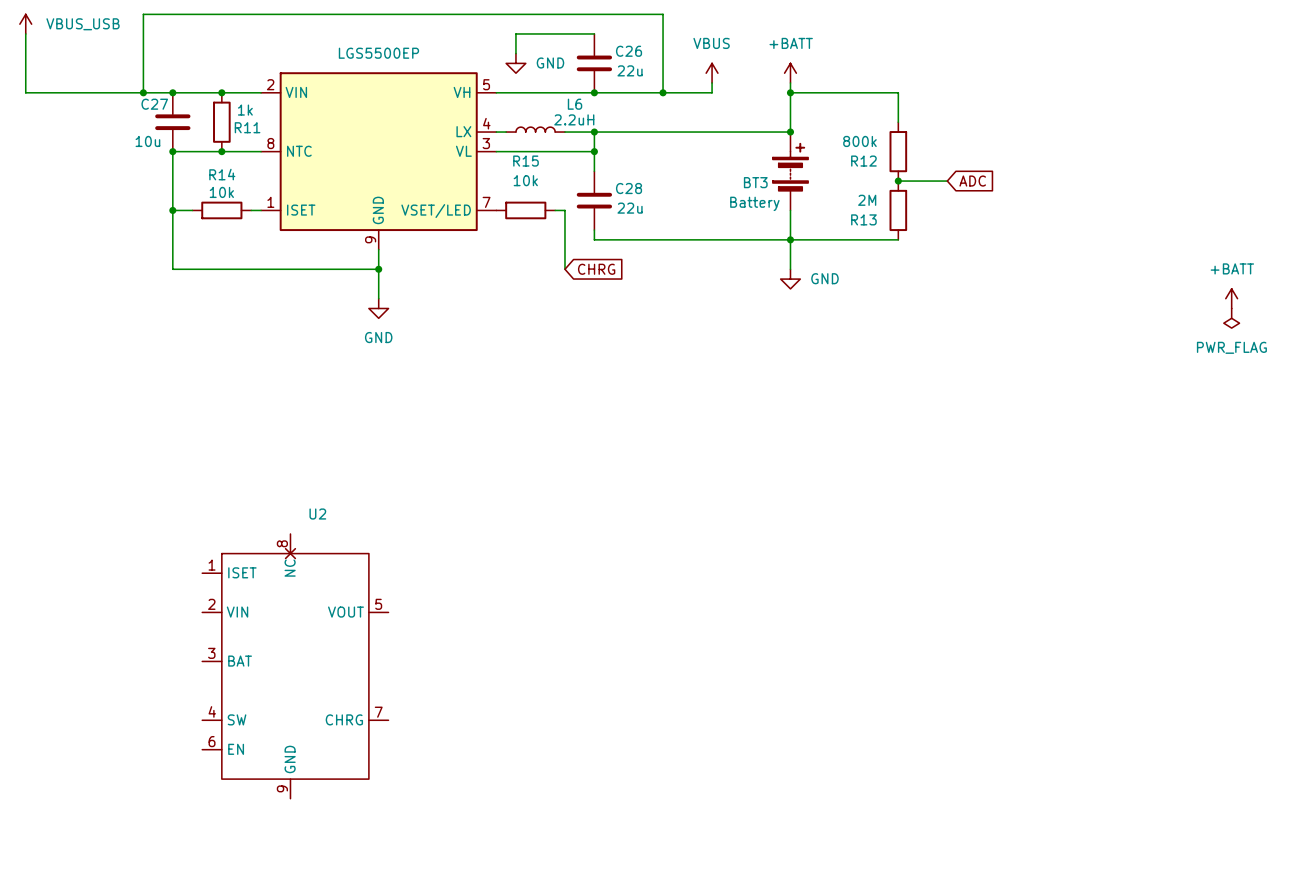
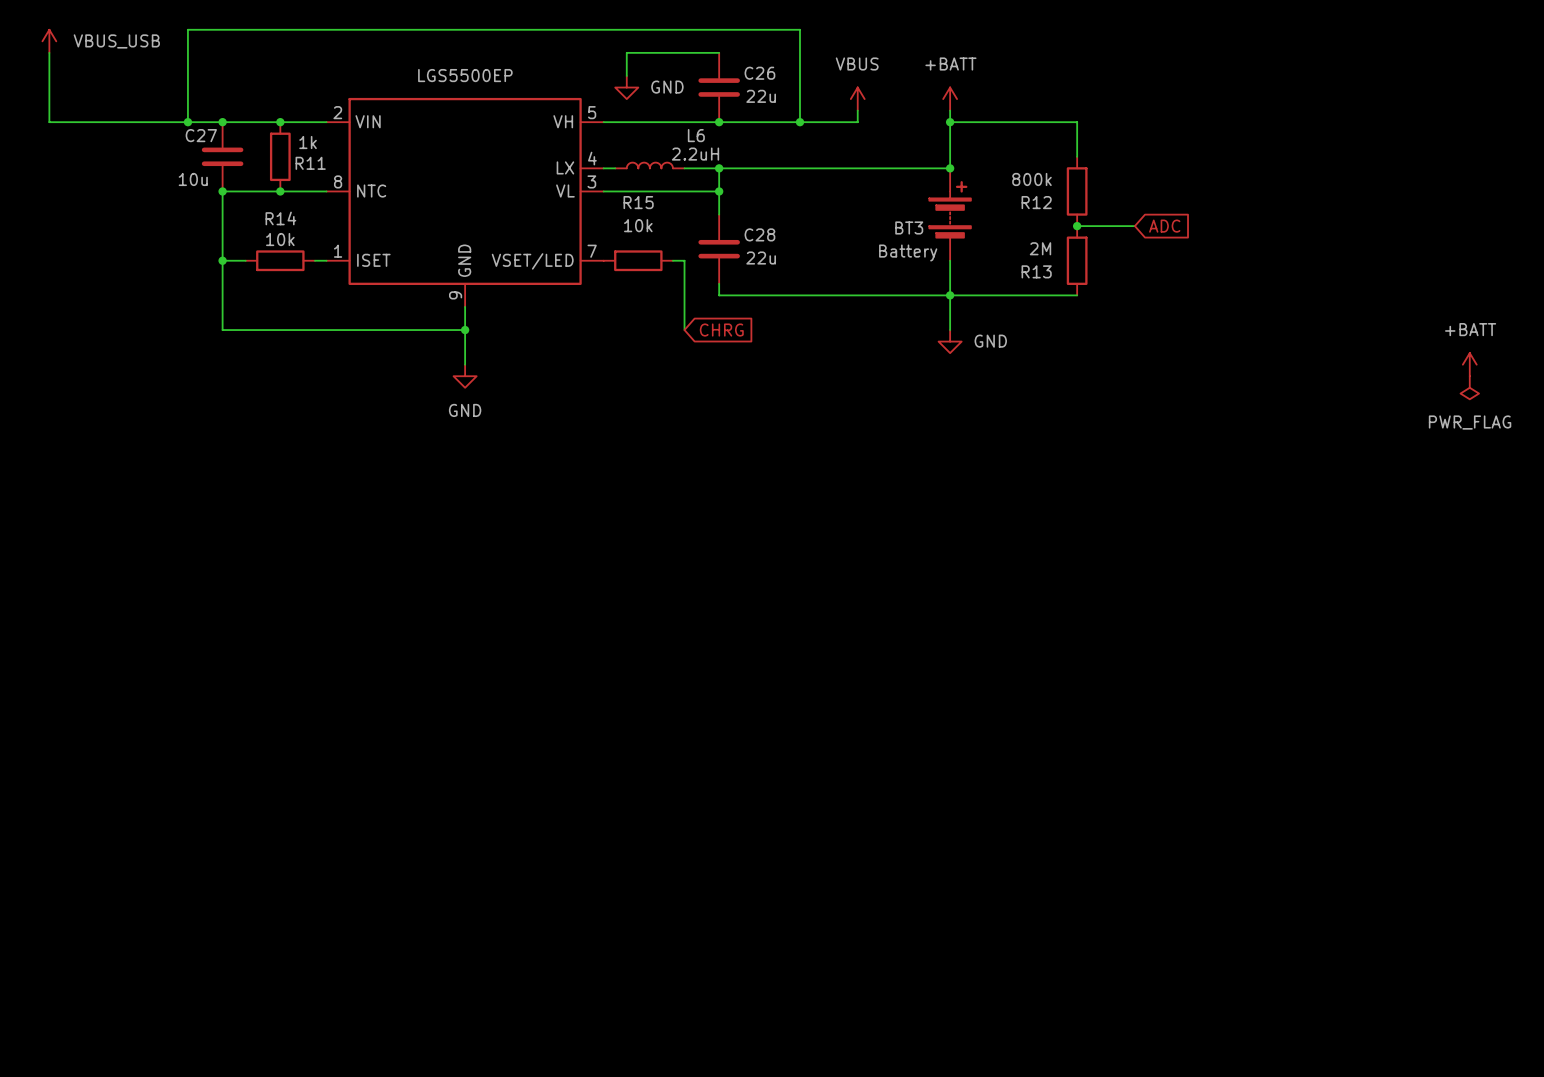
U2: (295, 666) -> none

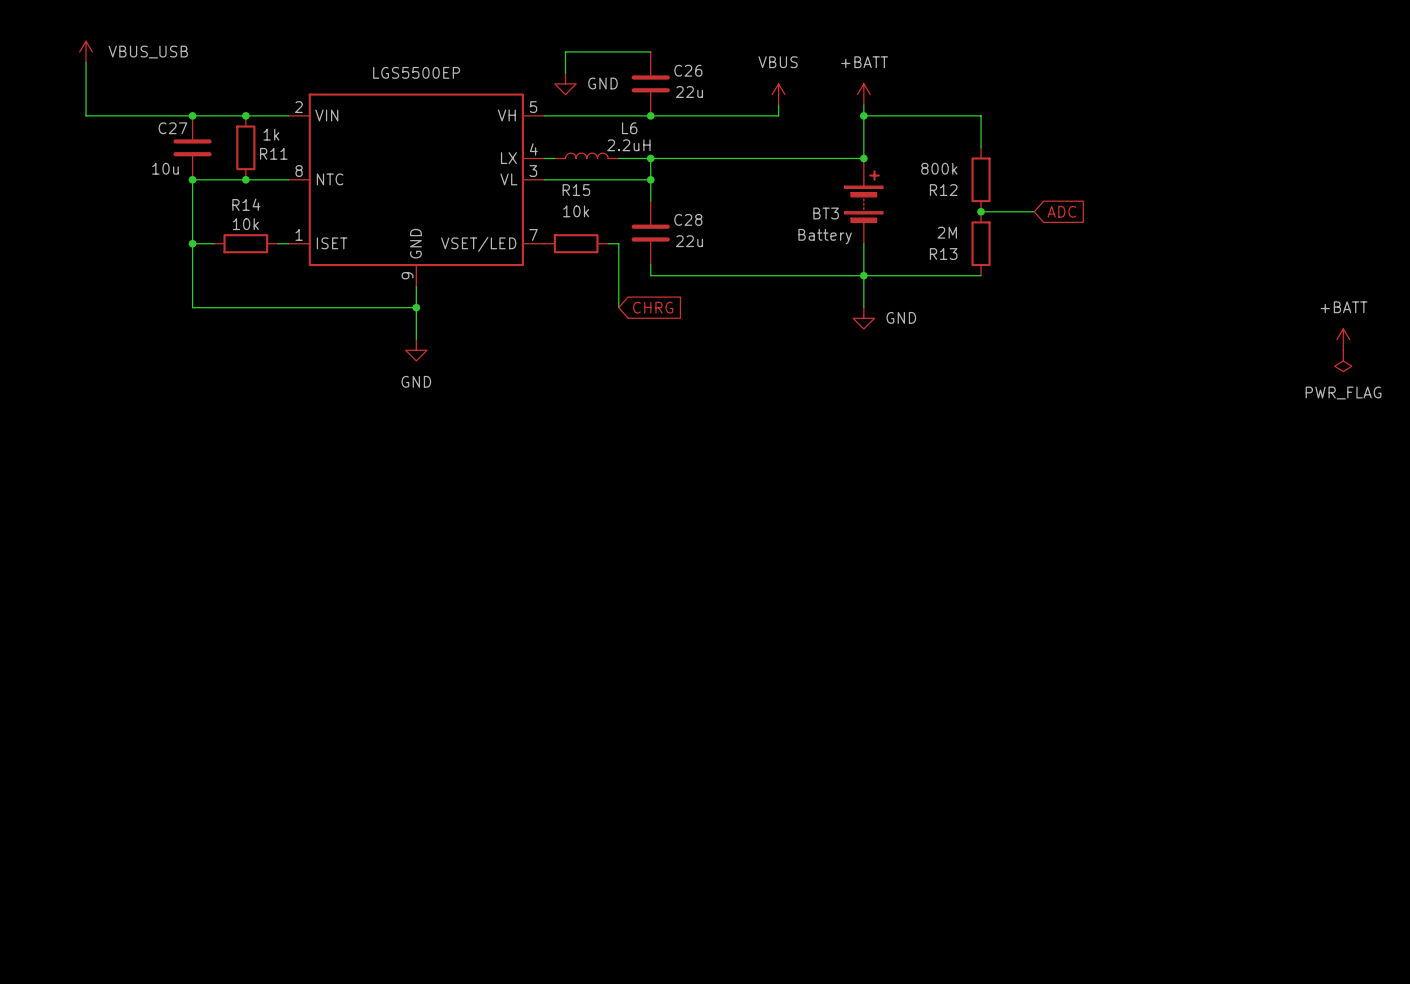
power symbol position: VBUS_USB (49, 41) -> VBUS_USB (86, 51)
wire: (49, 52) (49, 122) (107, 122) -> (86, 62) (86, 115)
wire: (187, 122) (187, 29) (800, 29) (800, 122) -> none
junction: (187, 122) -> none
junction: (800, 122) -> none

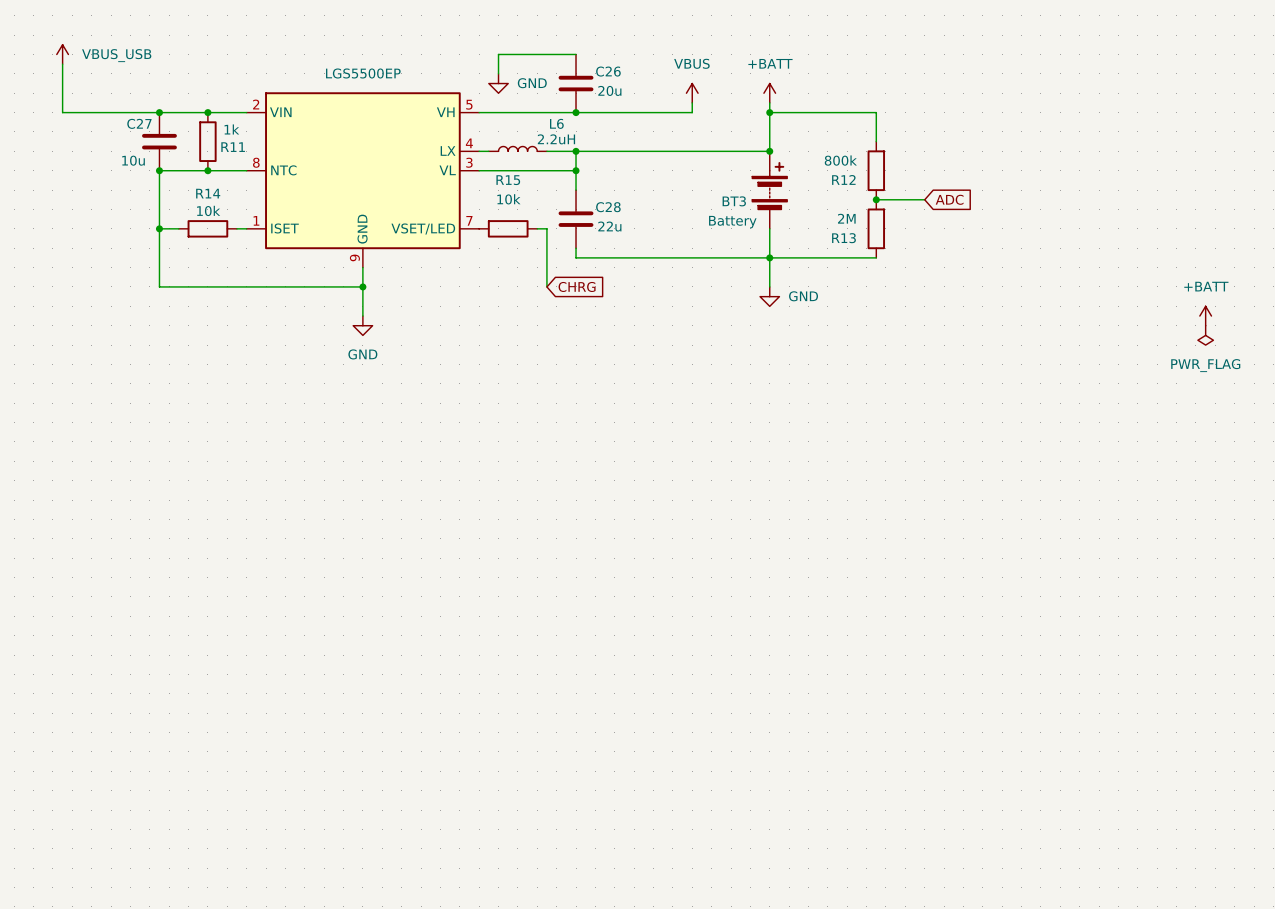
C26 value: 22u (689, 92) -> 20u (609, 90)

